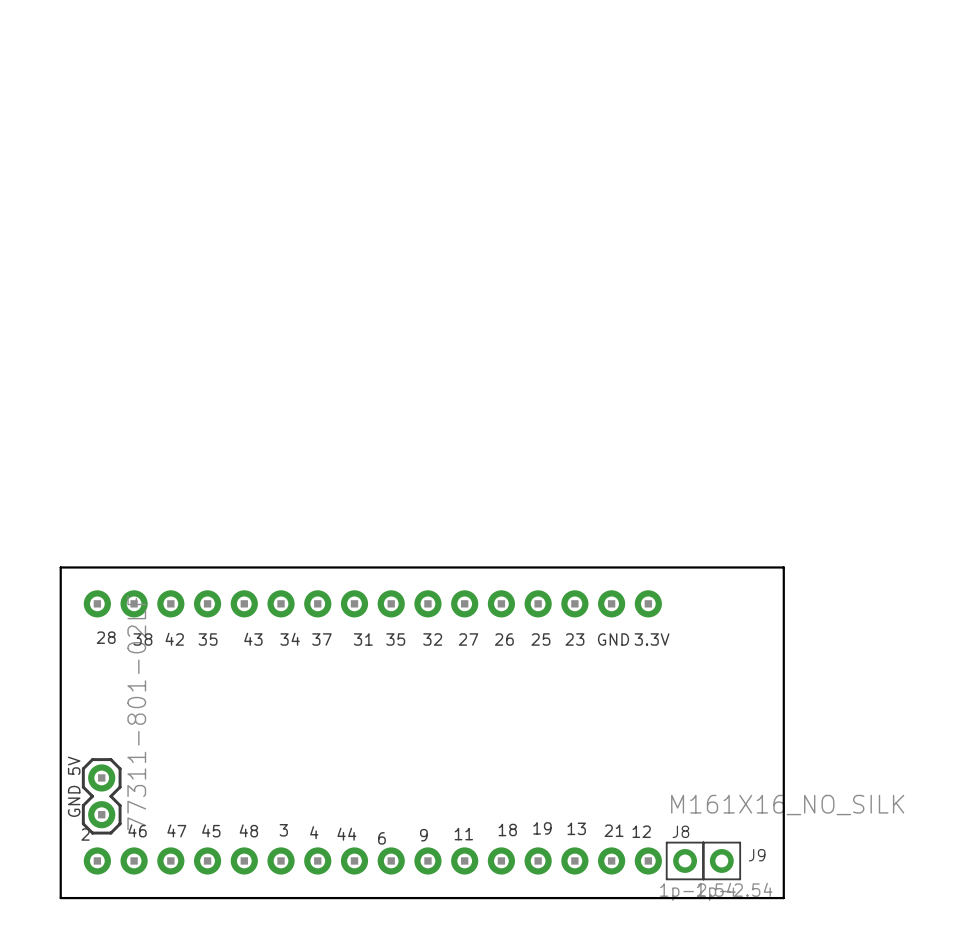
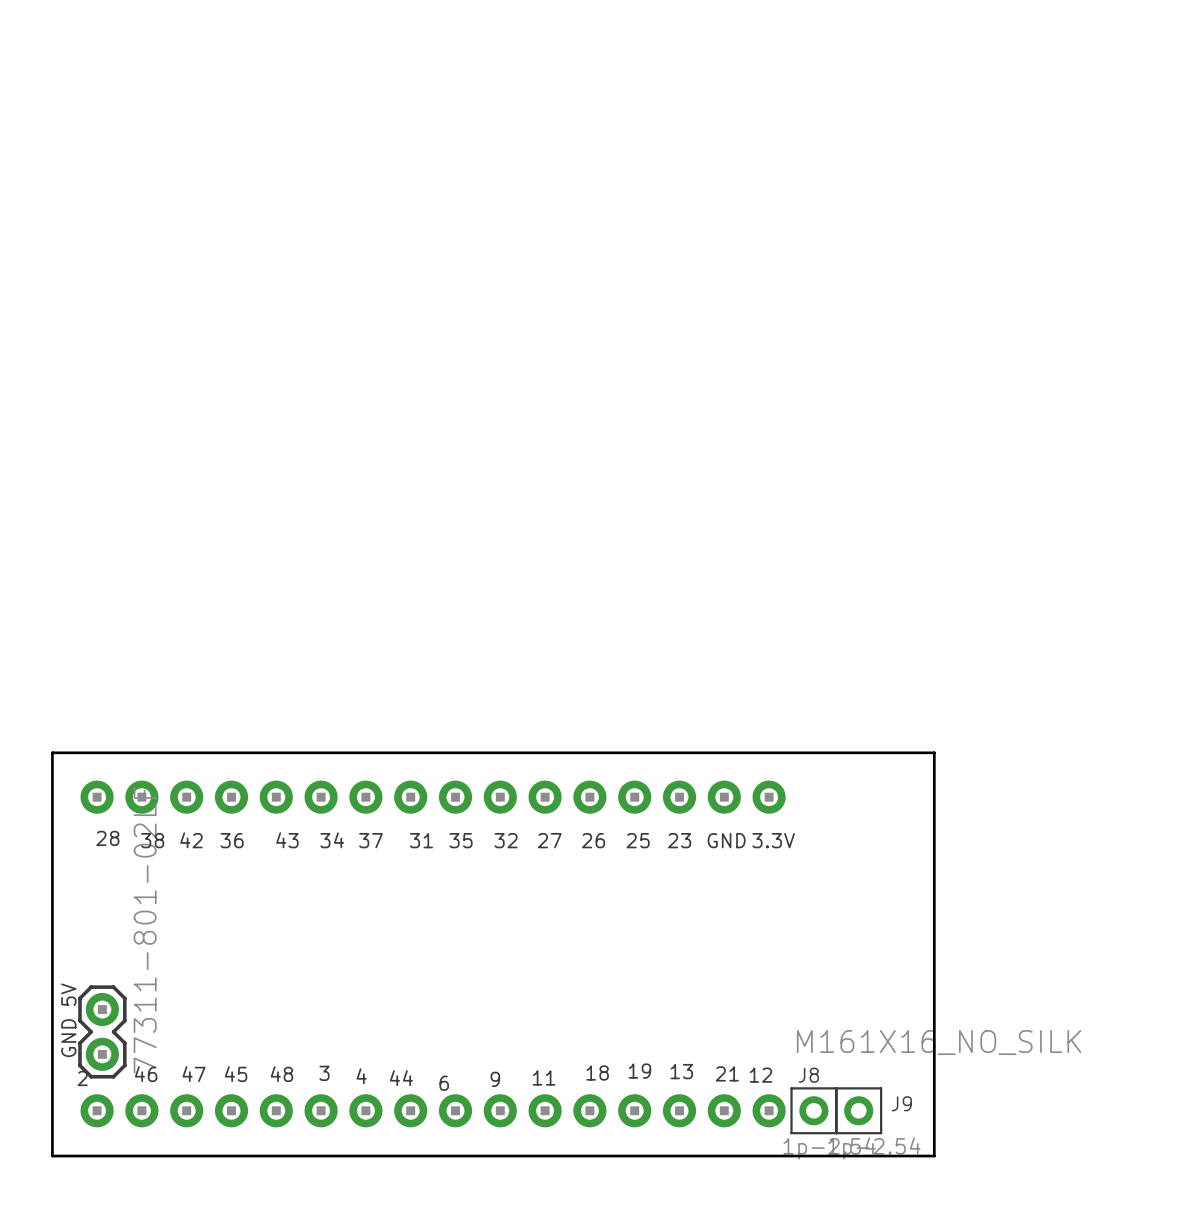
text: 35 (208, 639) -> 36 (232, 840)

